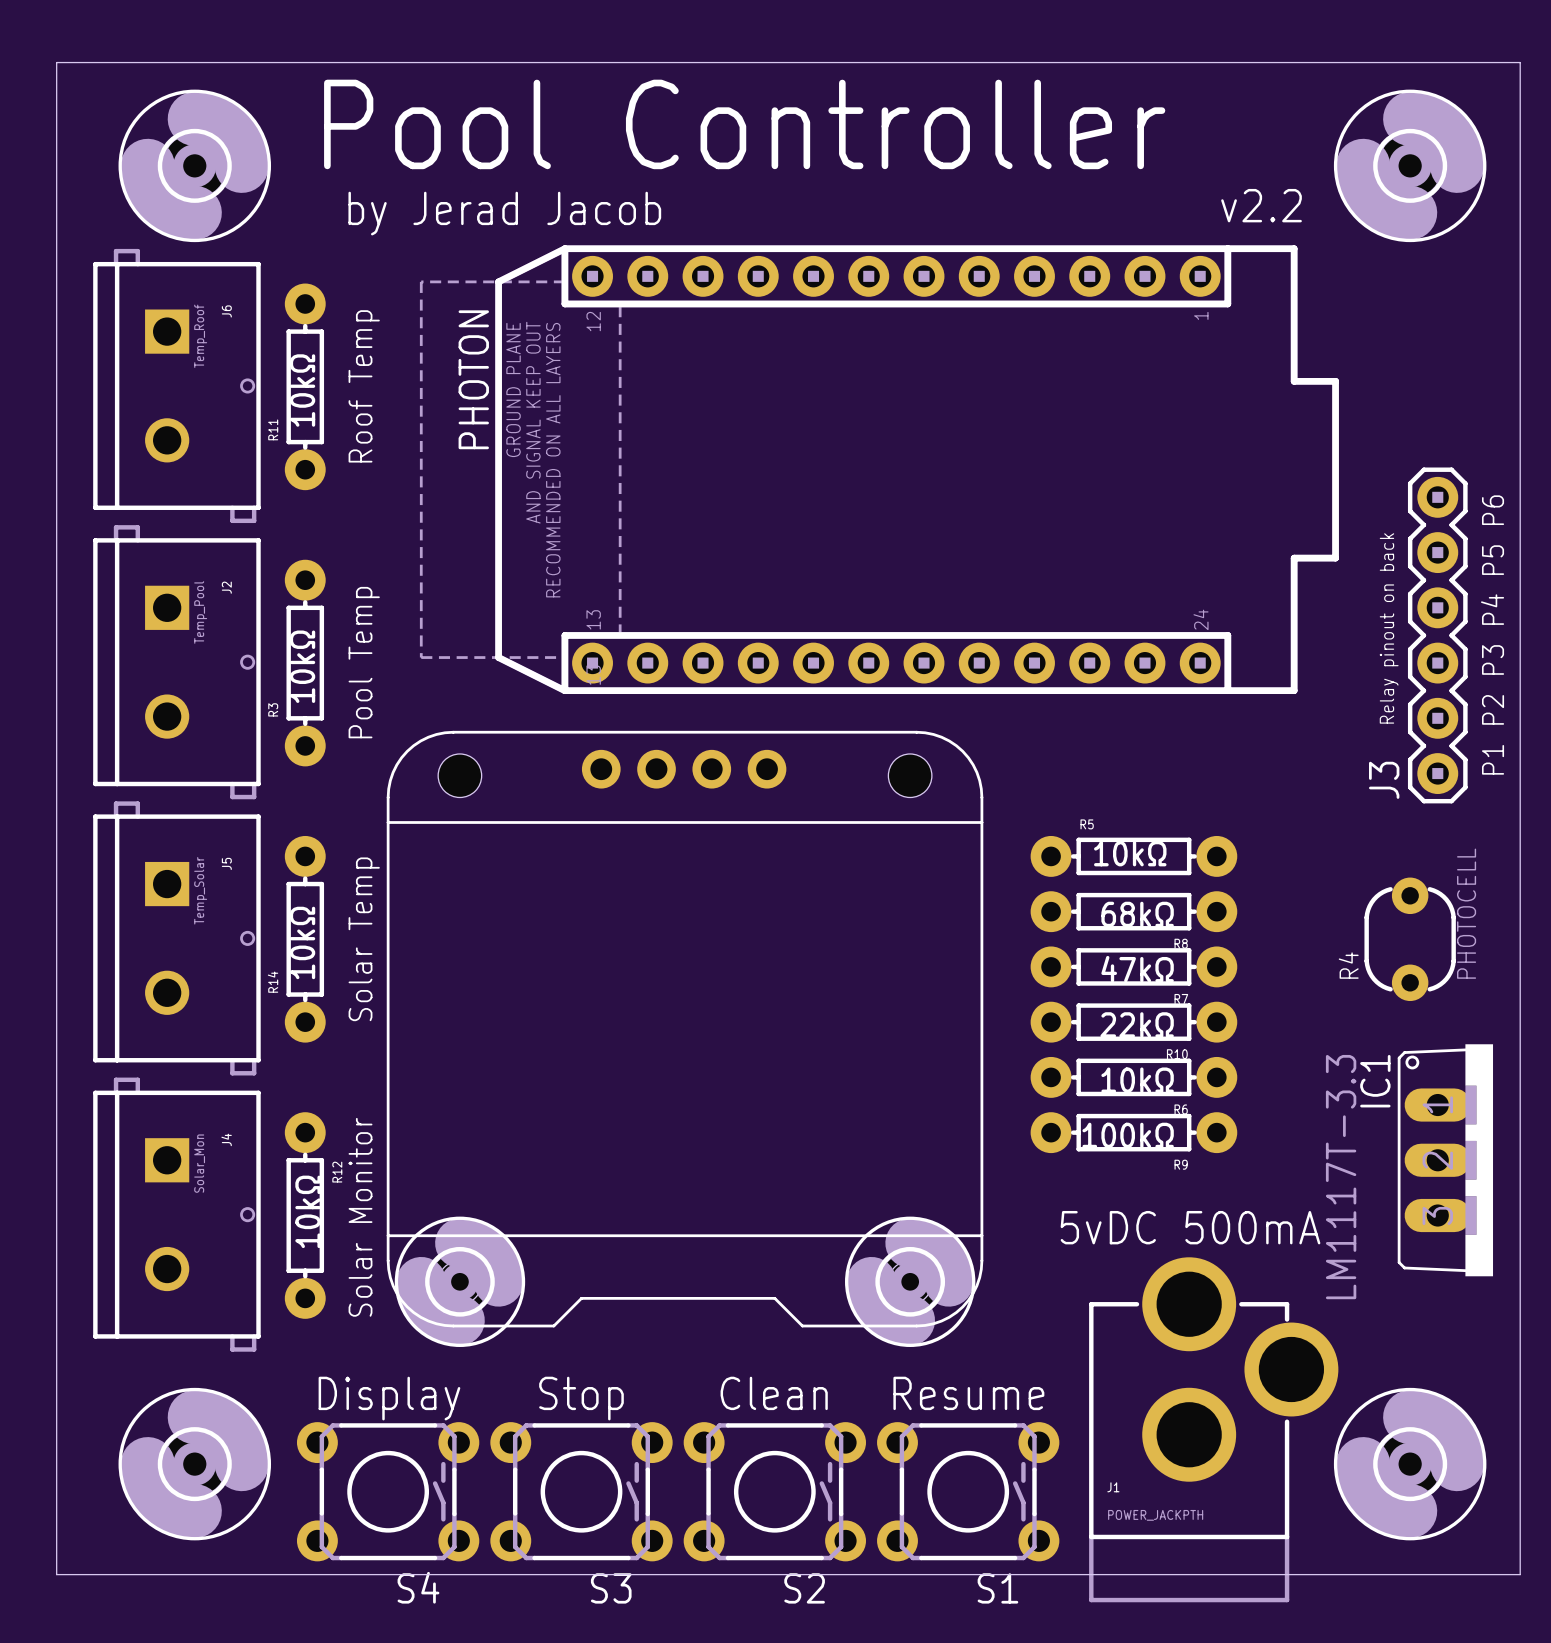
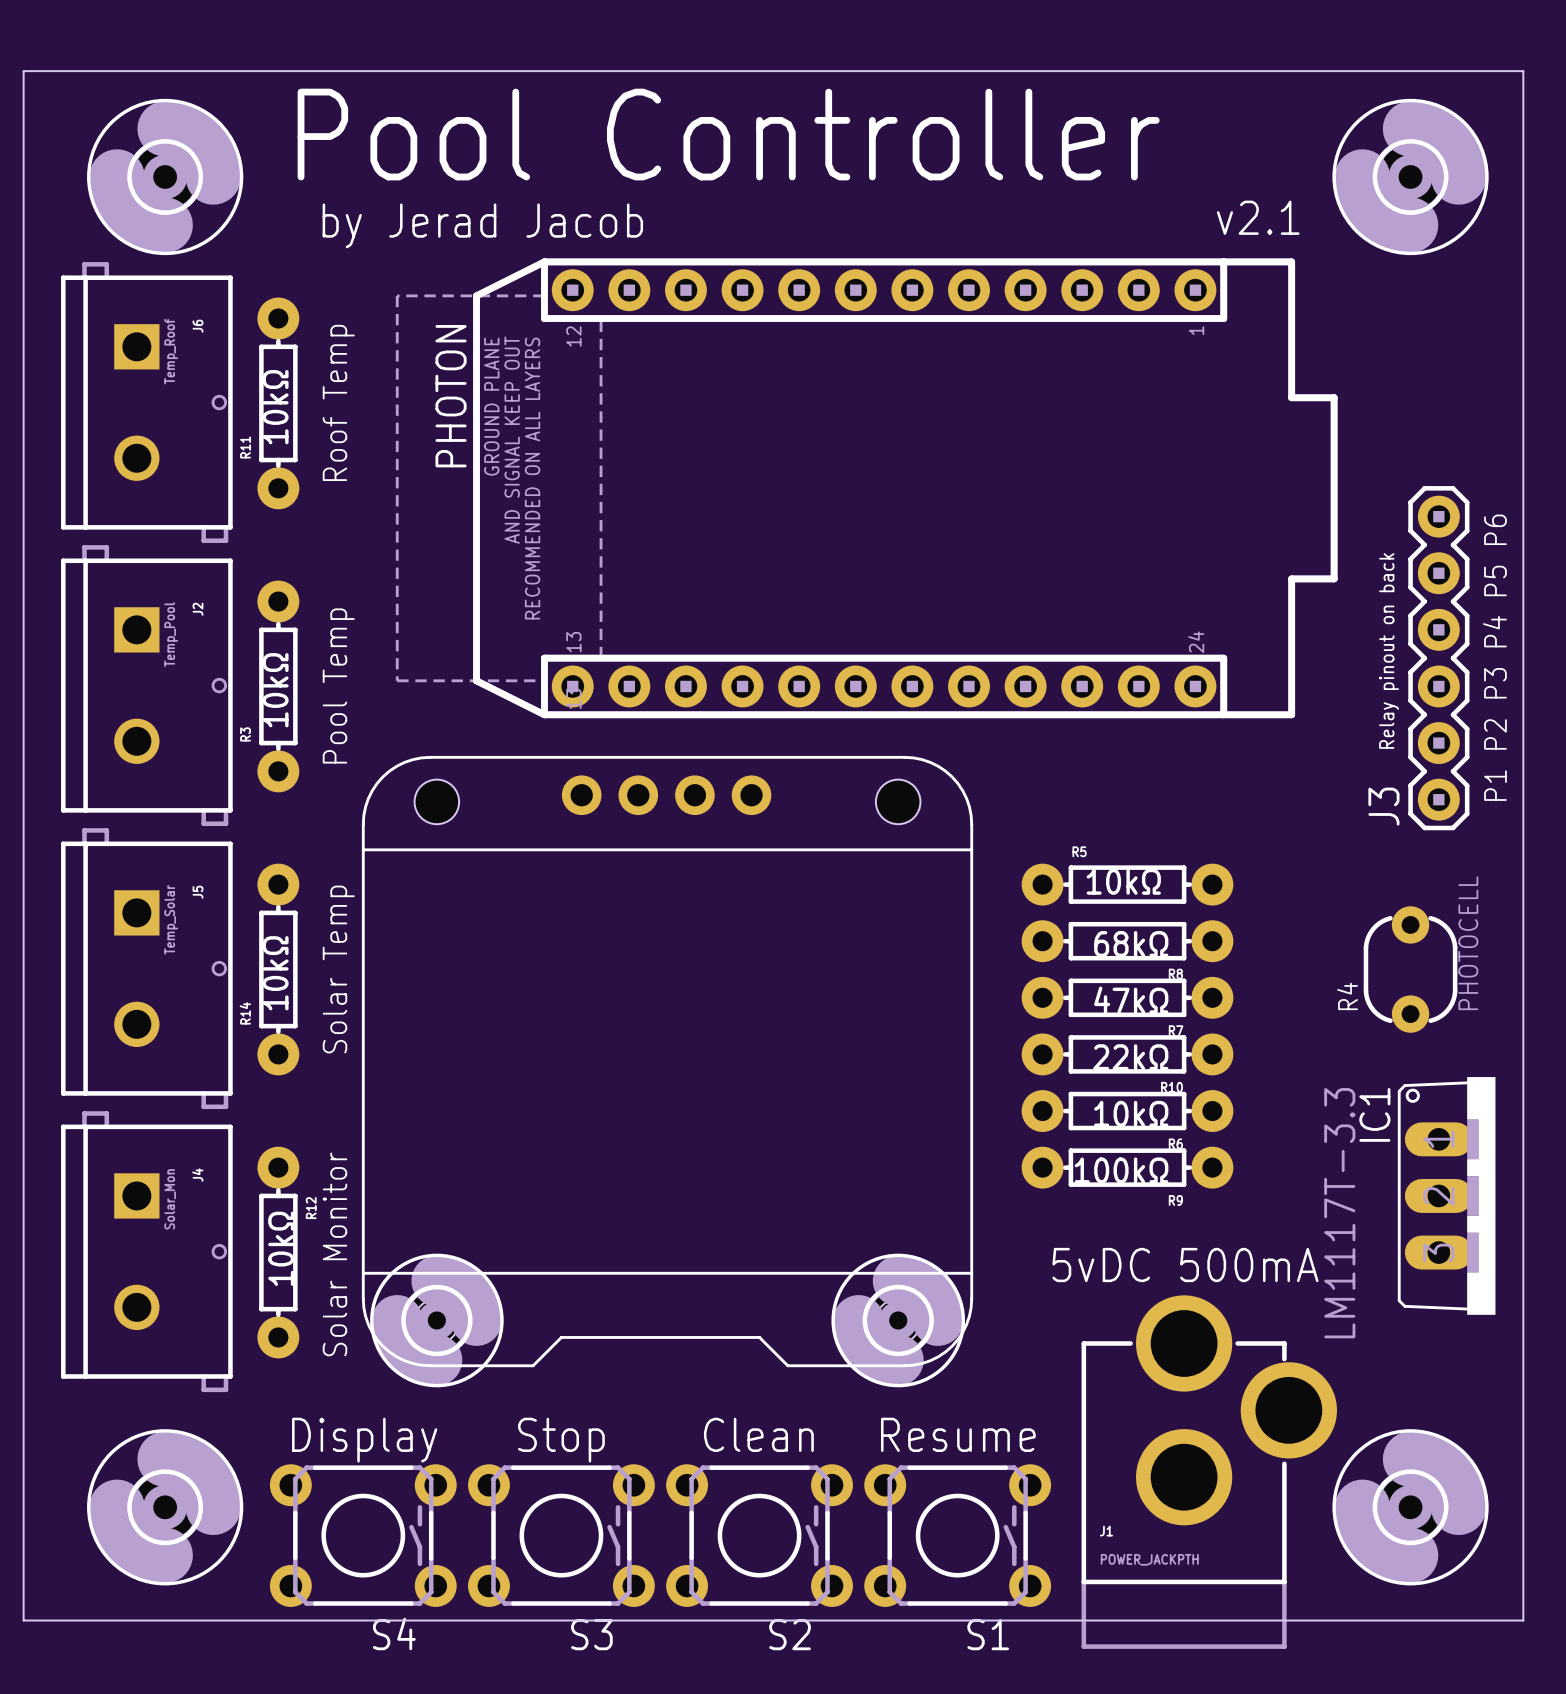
text: v2.2 (1261, 205) -> v2.1 (1258, 217)

